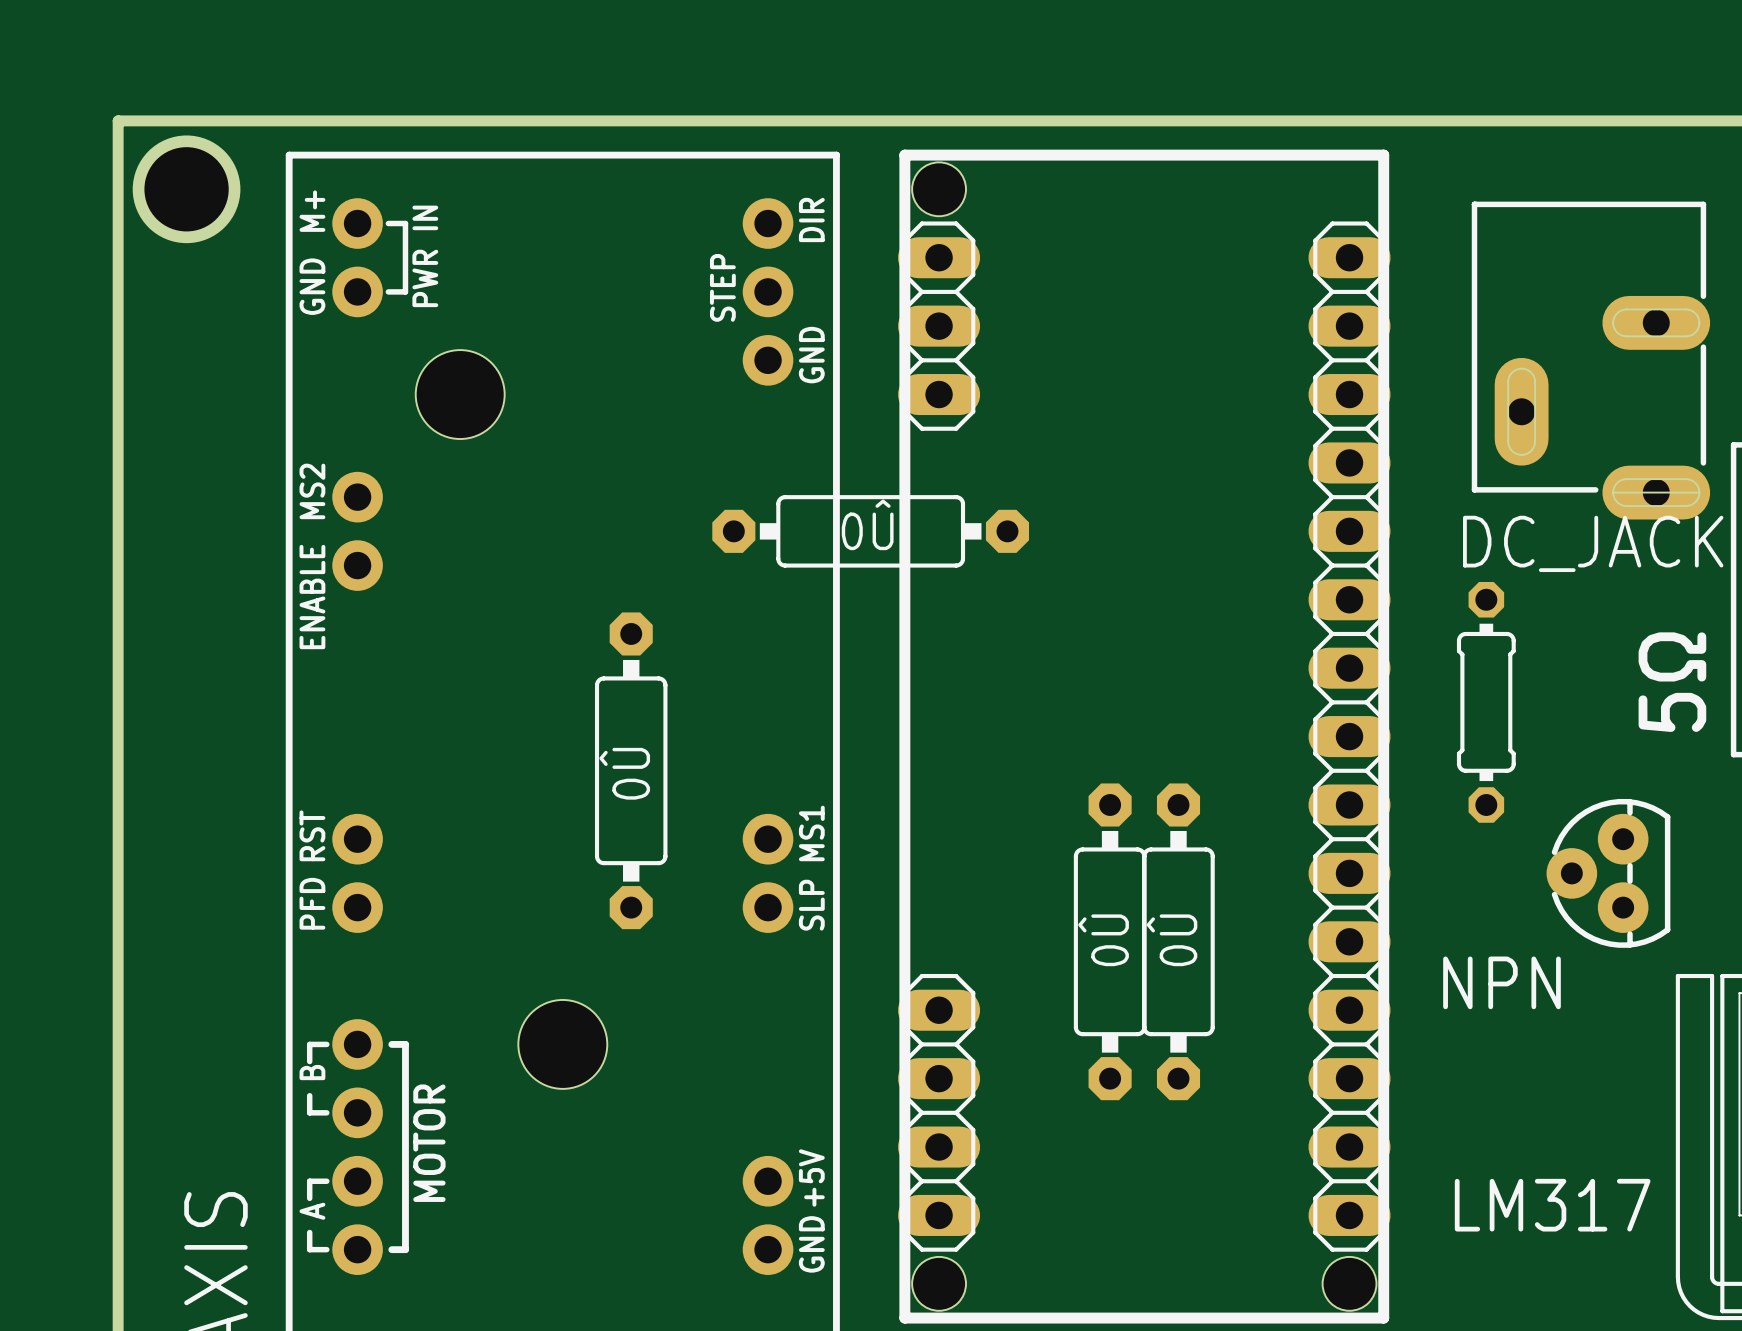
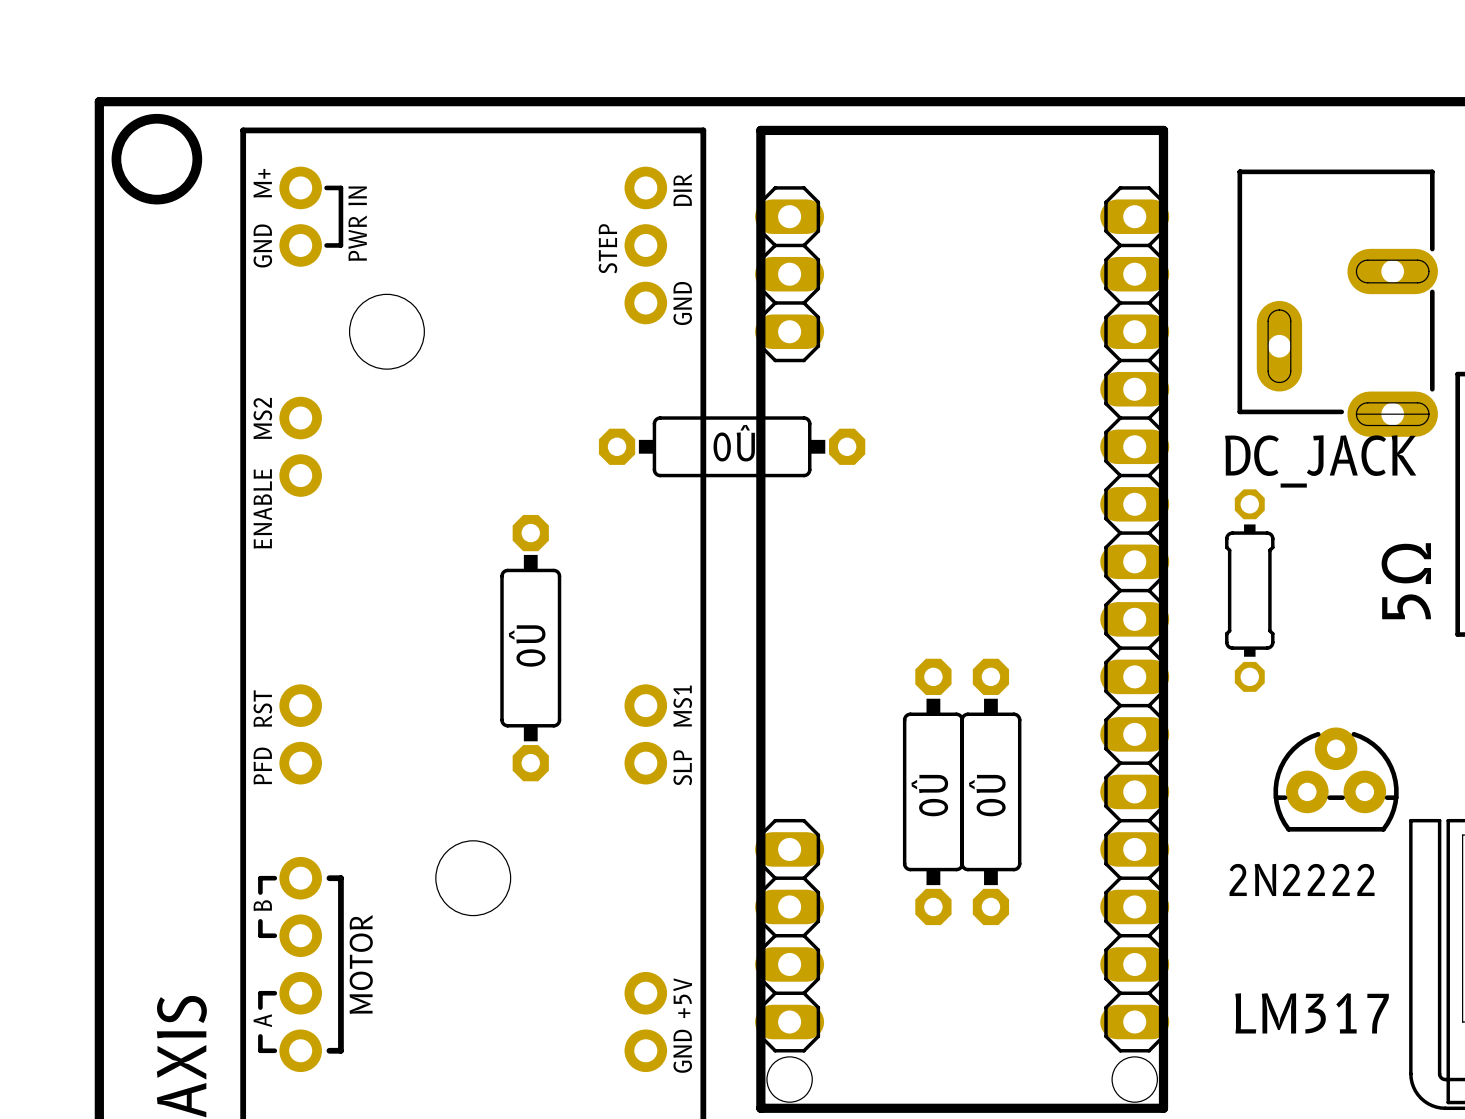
hole: (939, 189) -> none
NPN: (1608, 873) -> none
2N2222: none -> (1336, 779)

